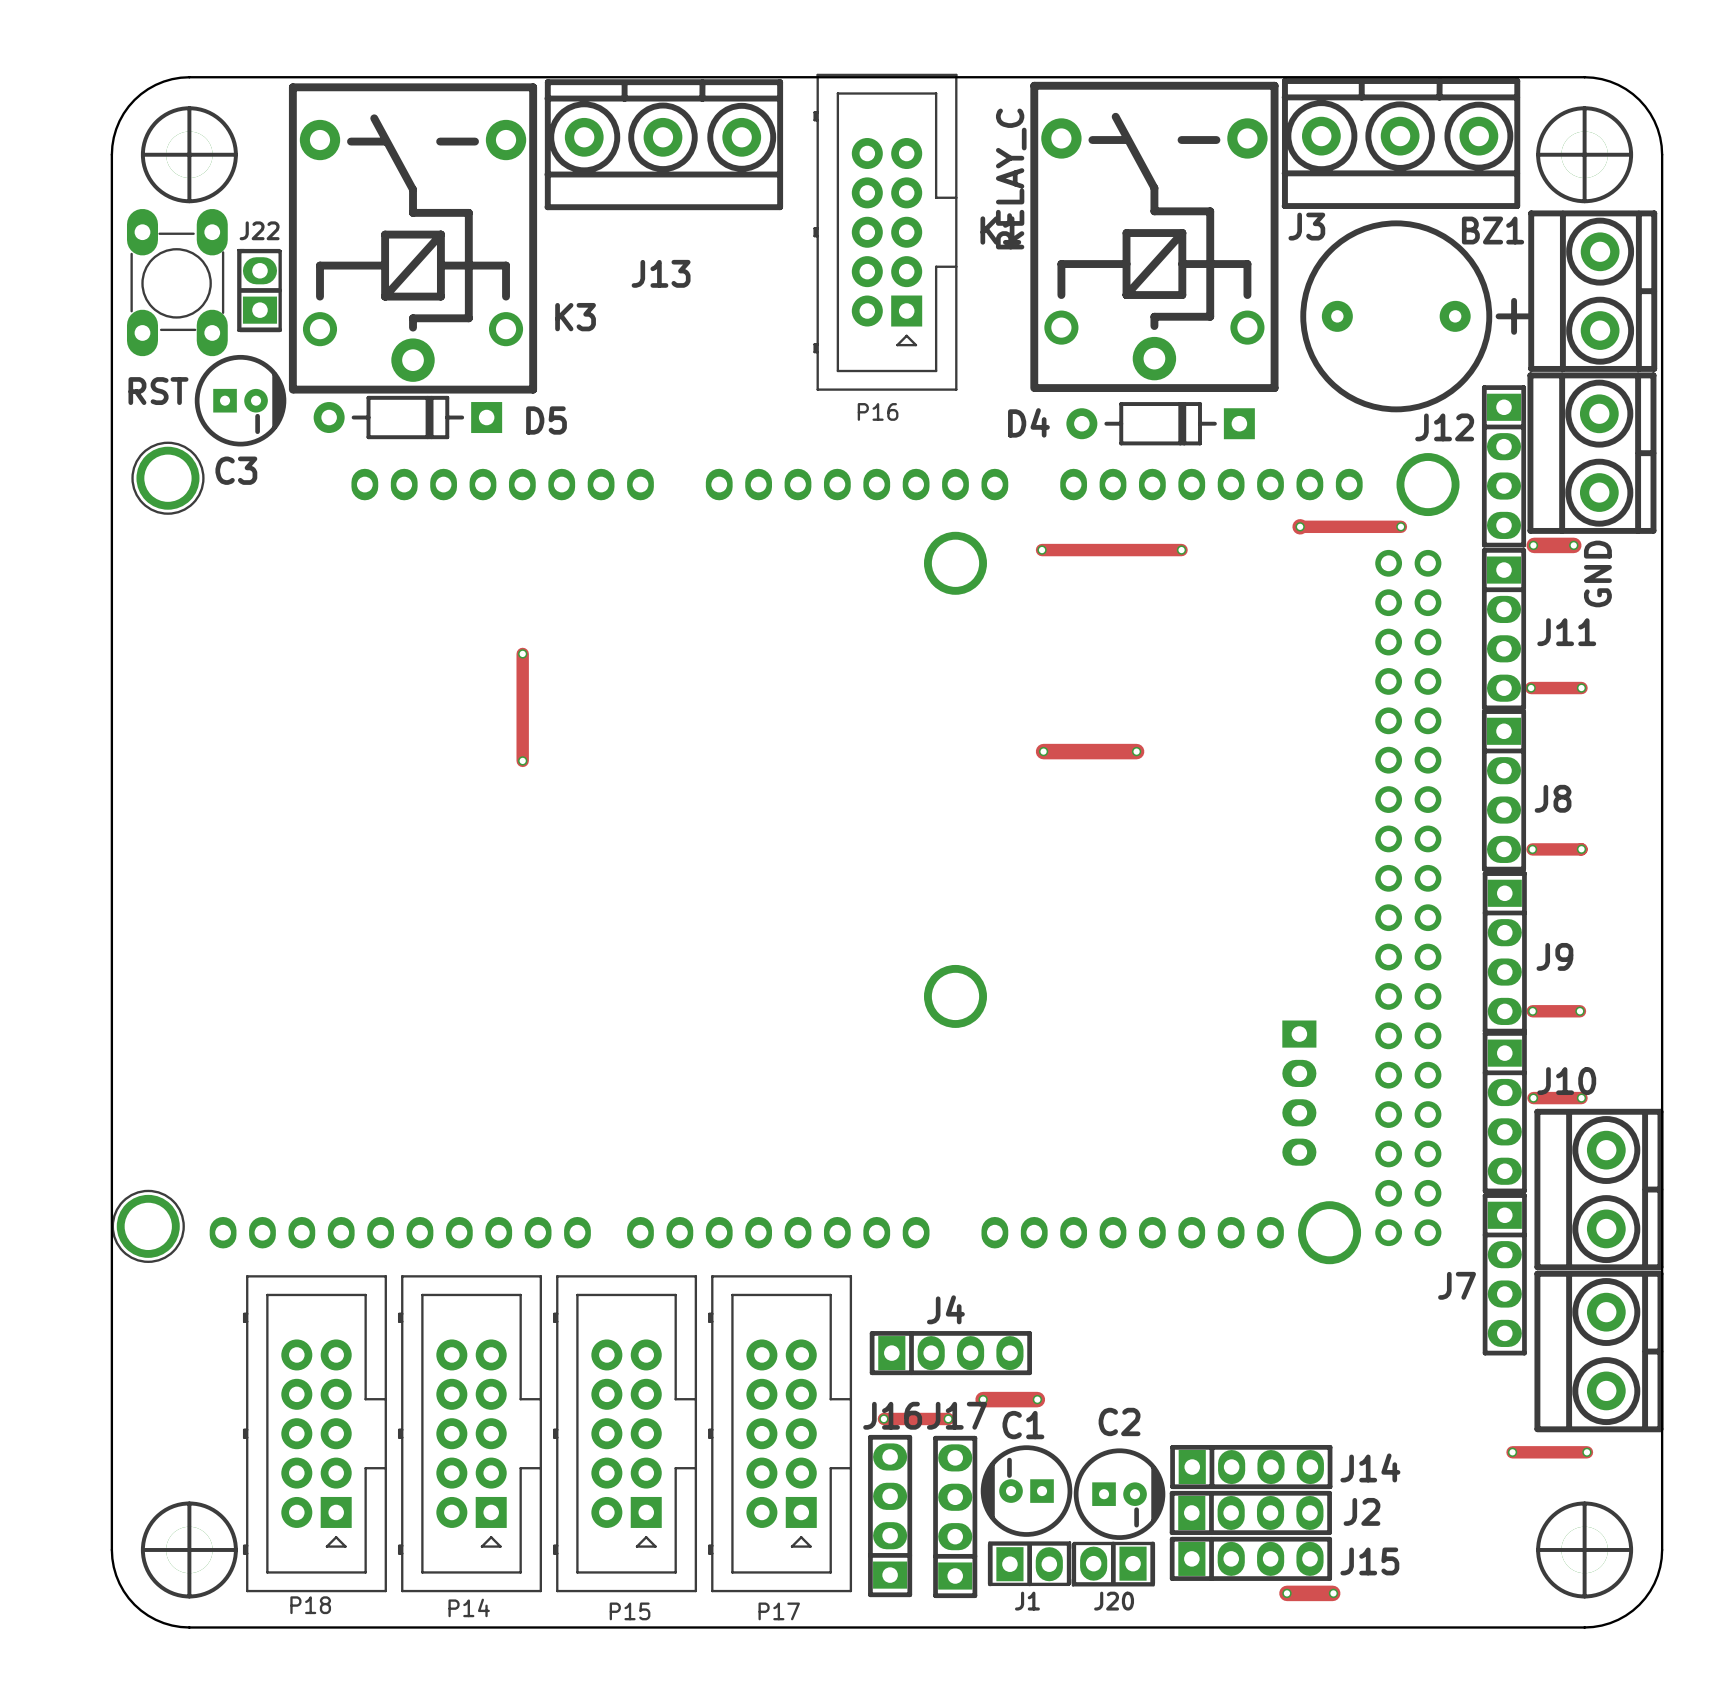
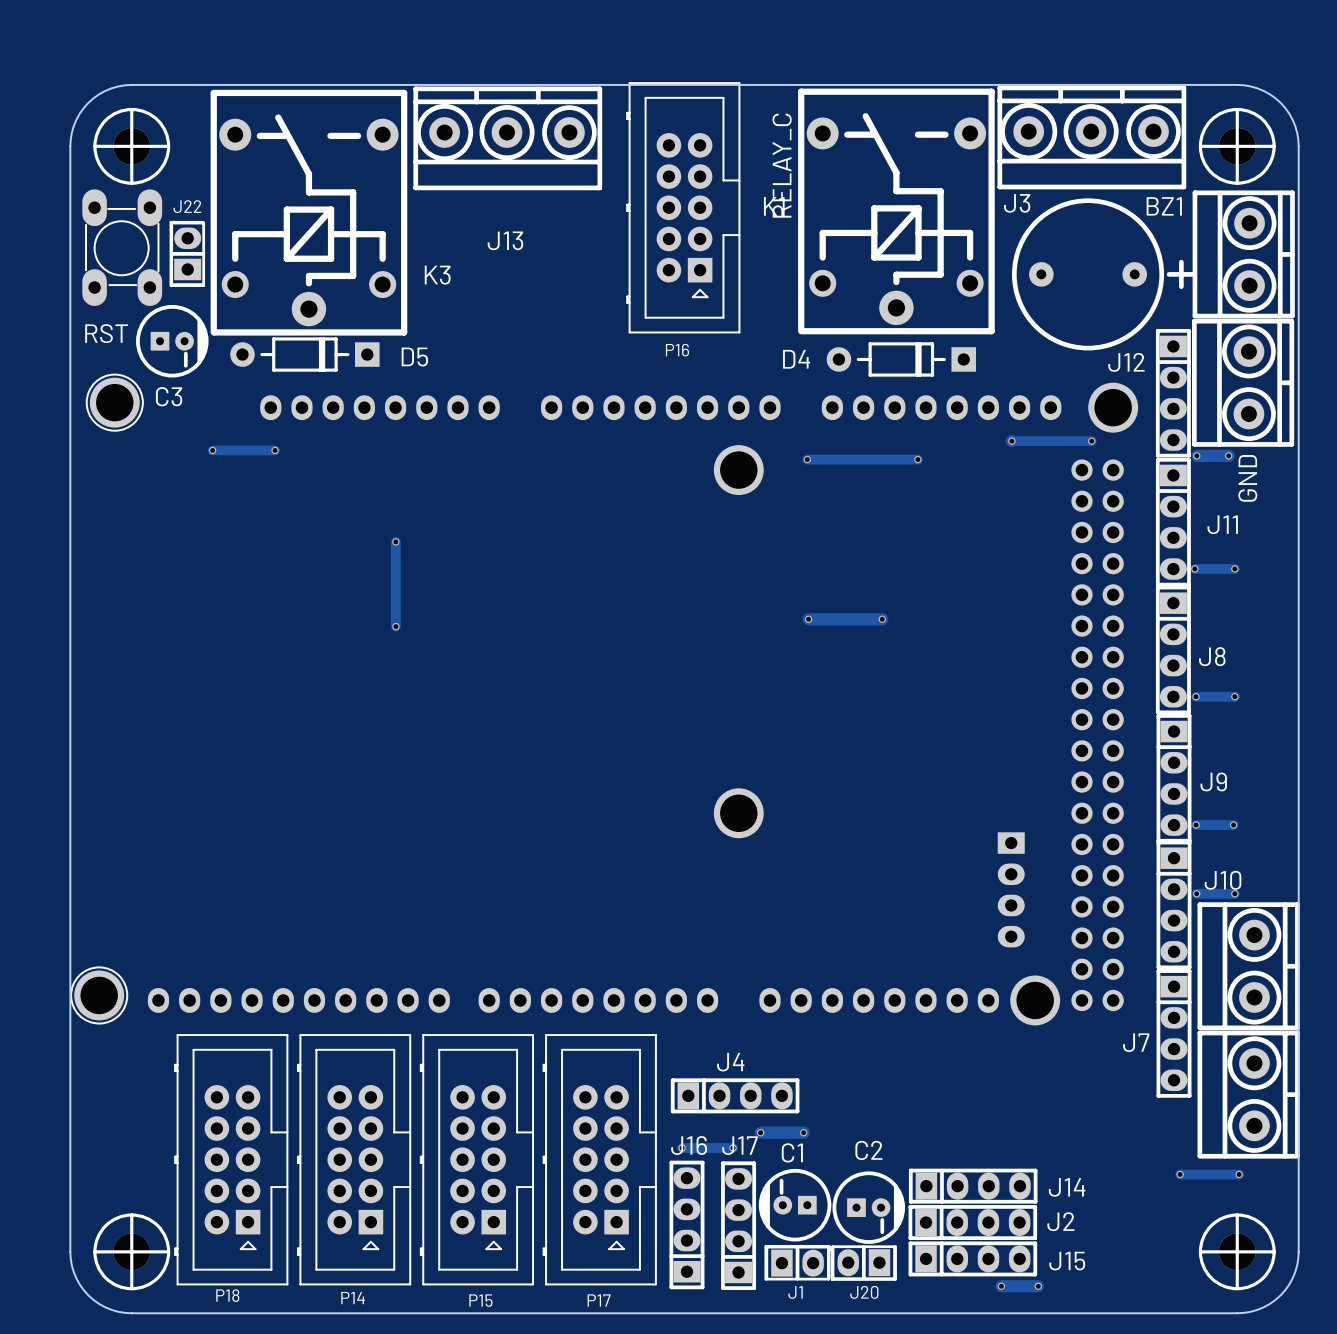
track: none -> (212, 450) (275, 450)
via: none -> (212, 450)
via: none -> (275, 450)

